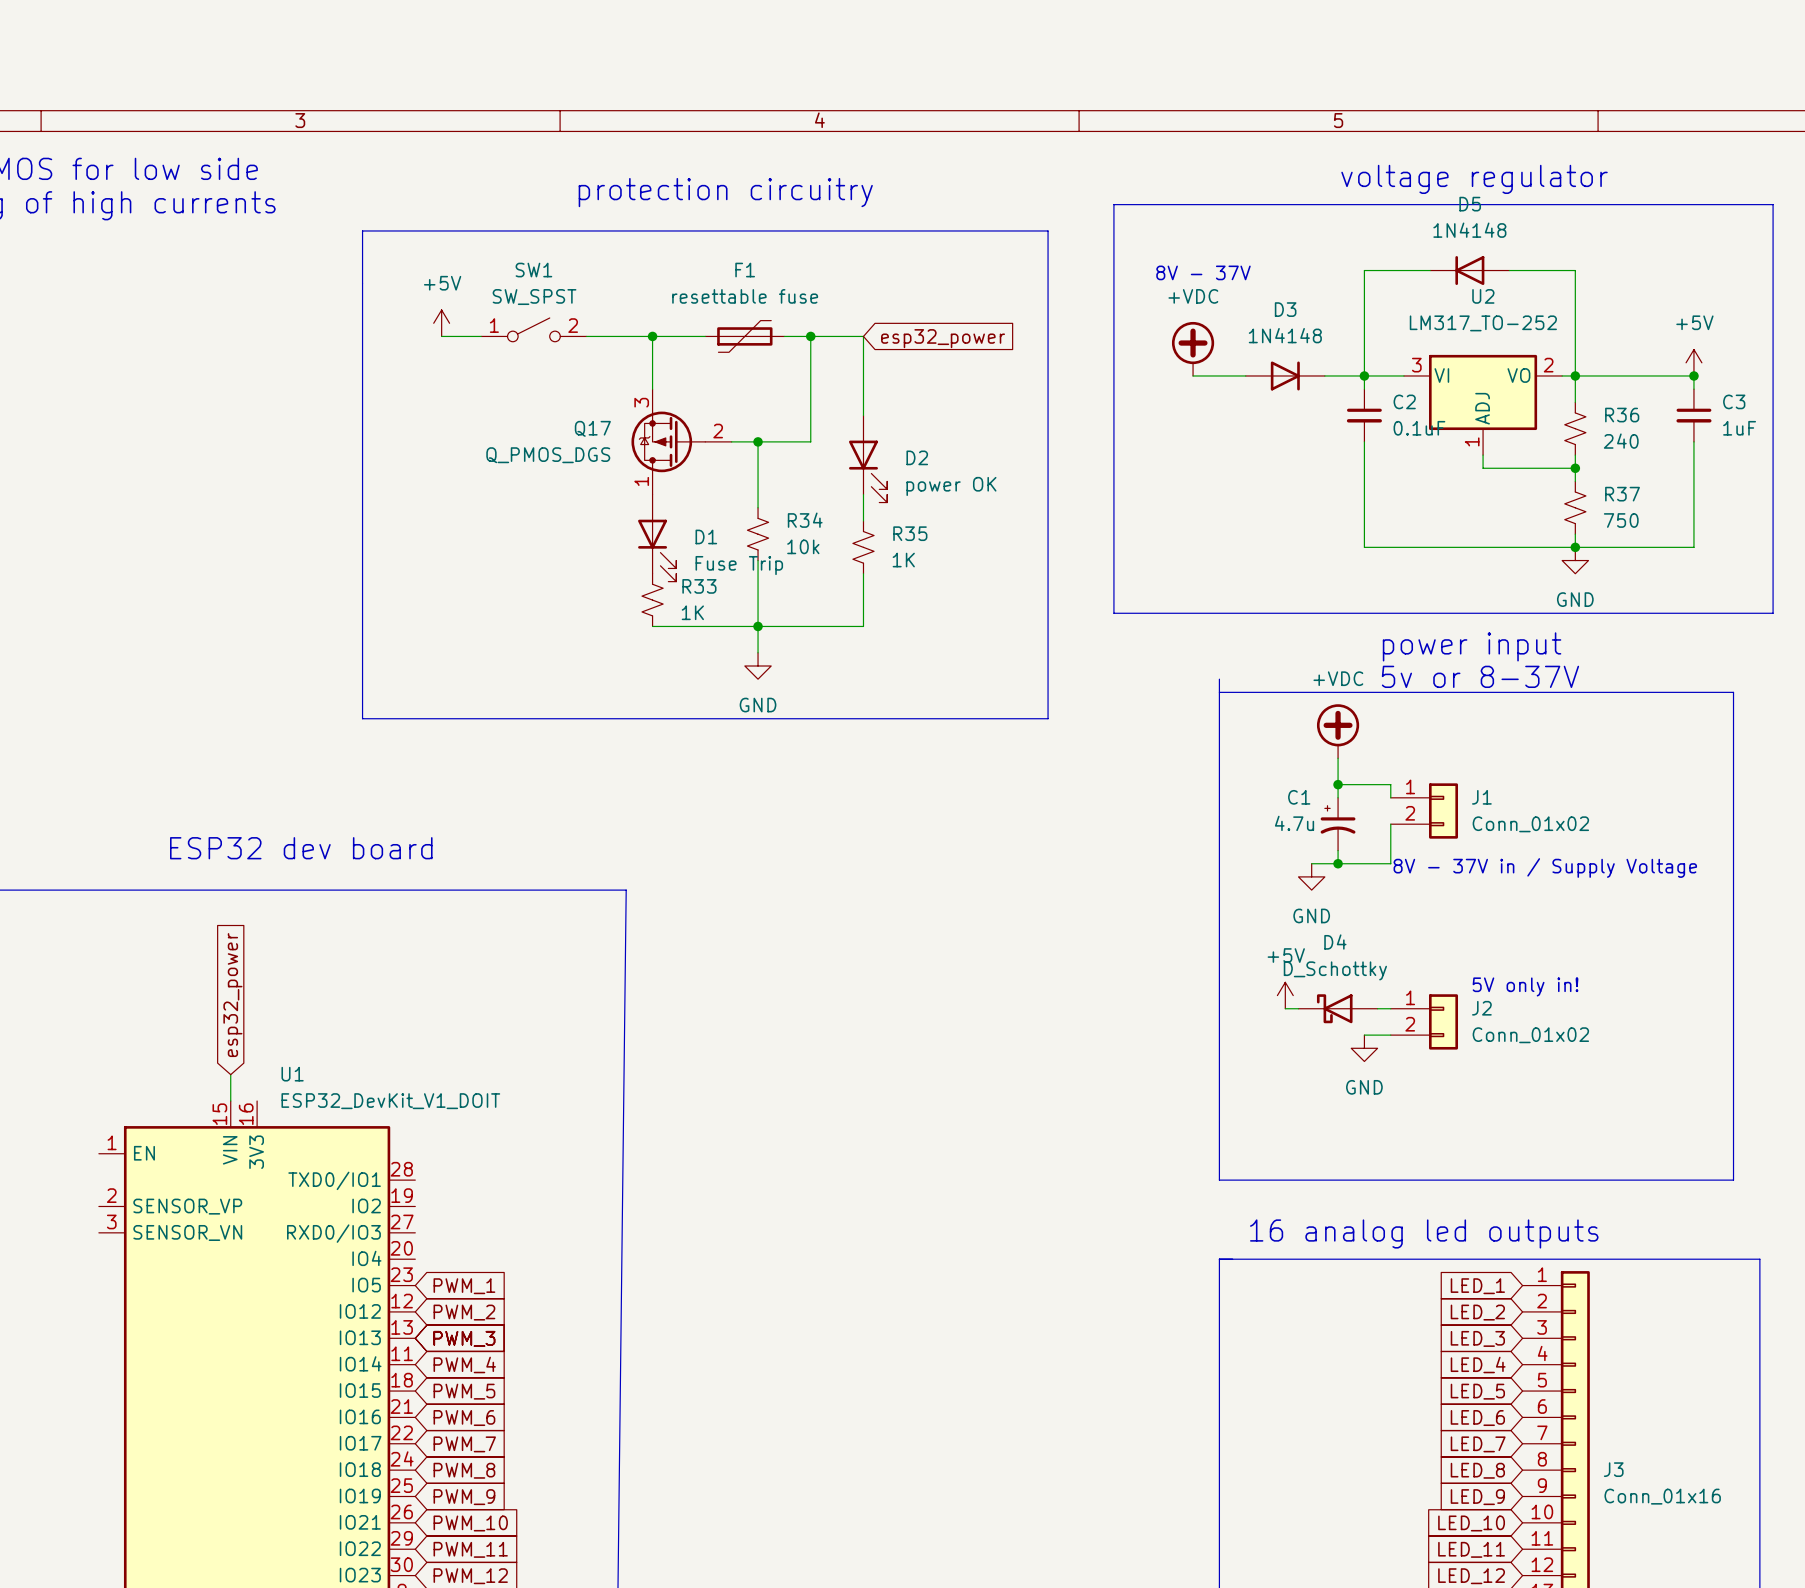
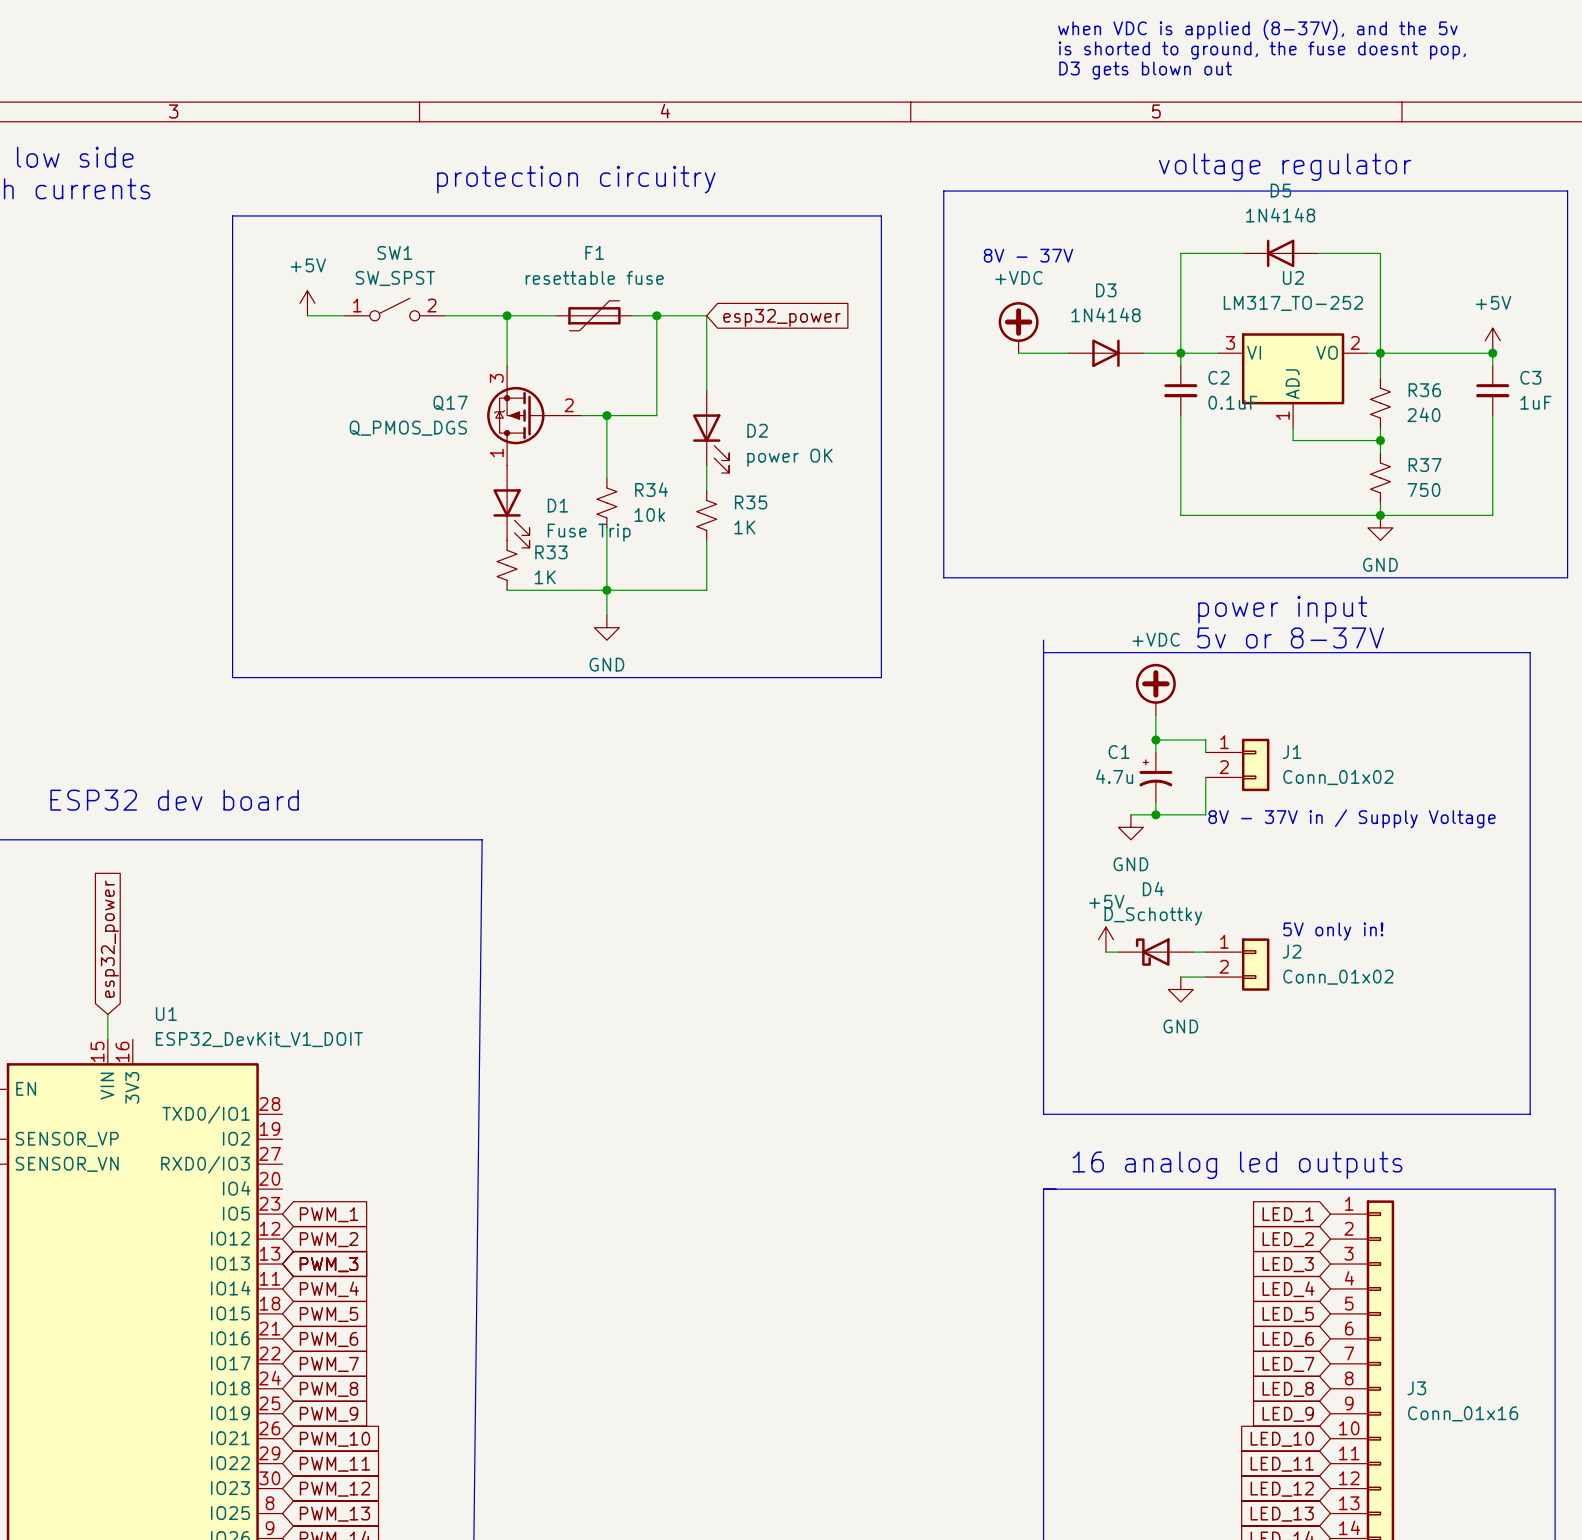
text: none -> when VDC is applied (8-37V), and the 5v (1257, 29)
text: none -> is shorted to ground, the fuse doesnt pop, (1262, 50)
text: none -> D3 gets blown out (1145, 70)

